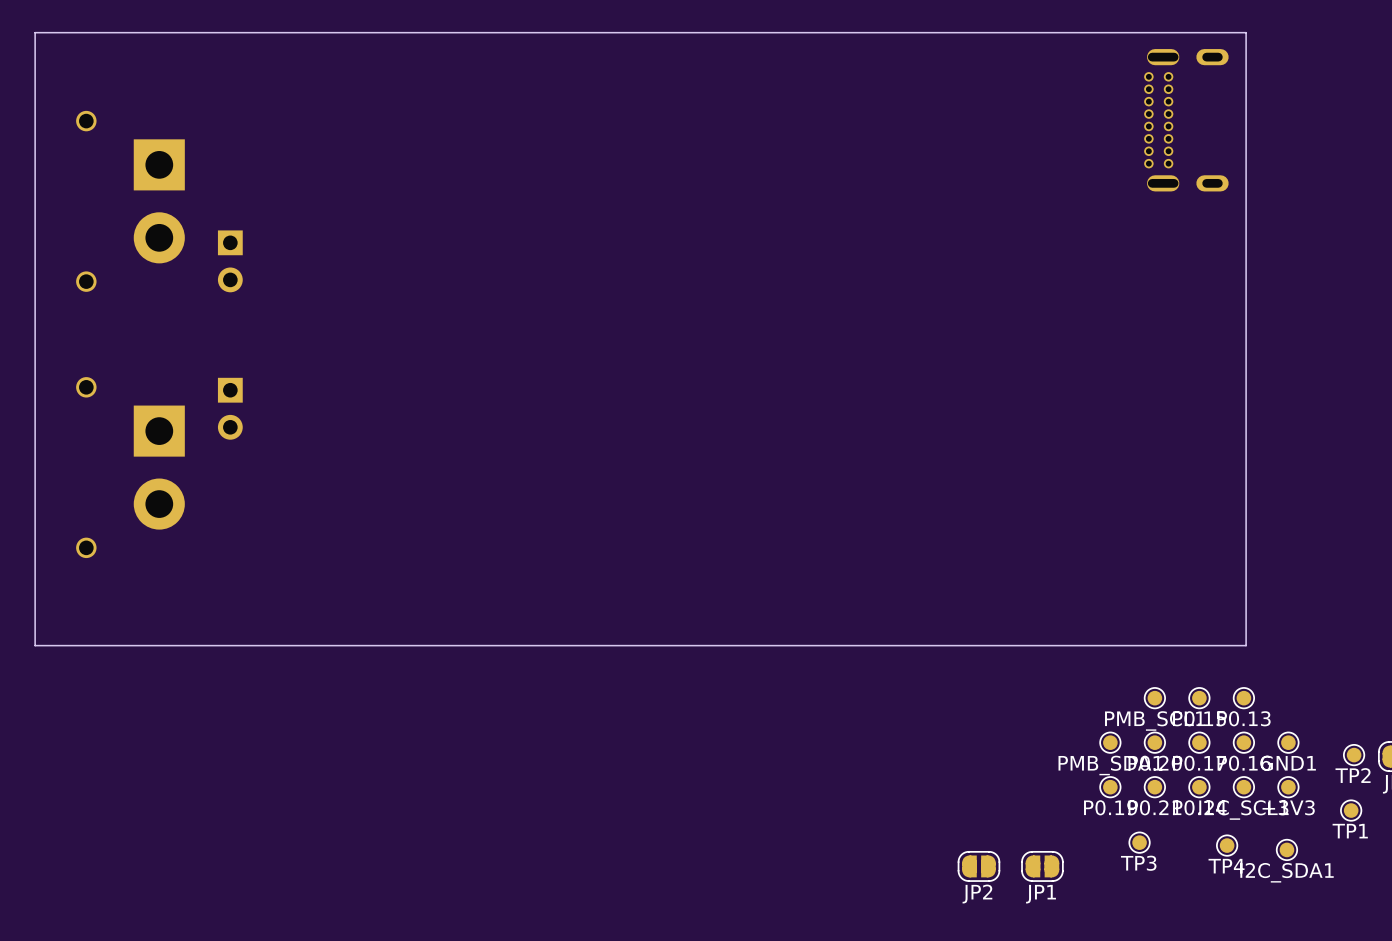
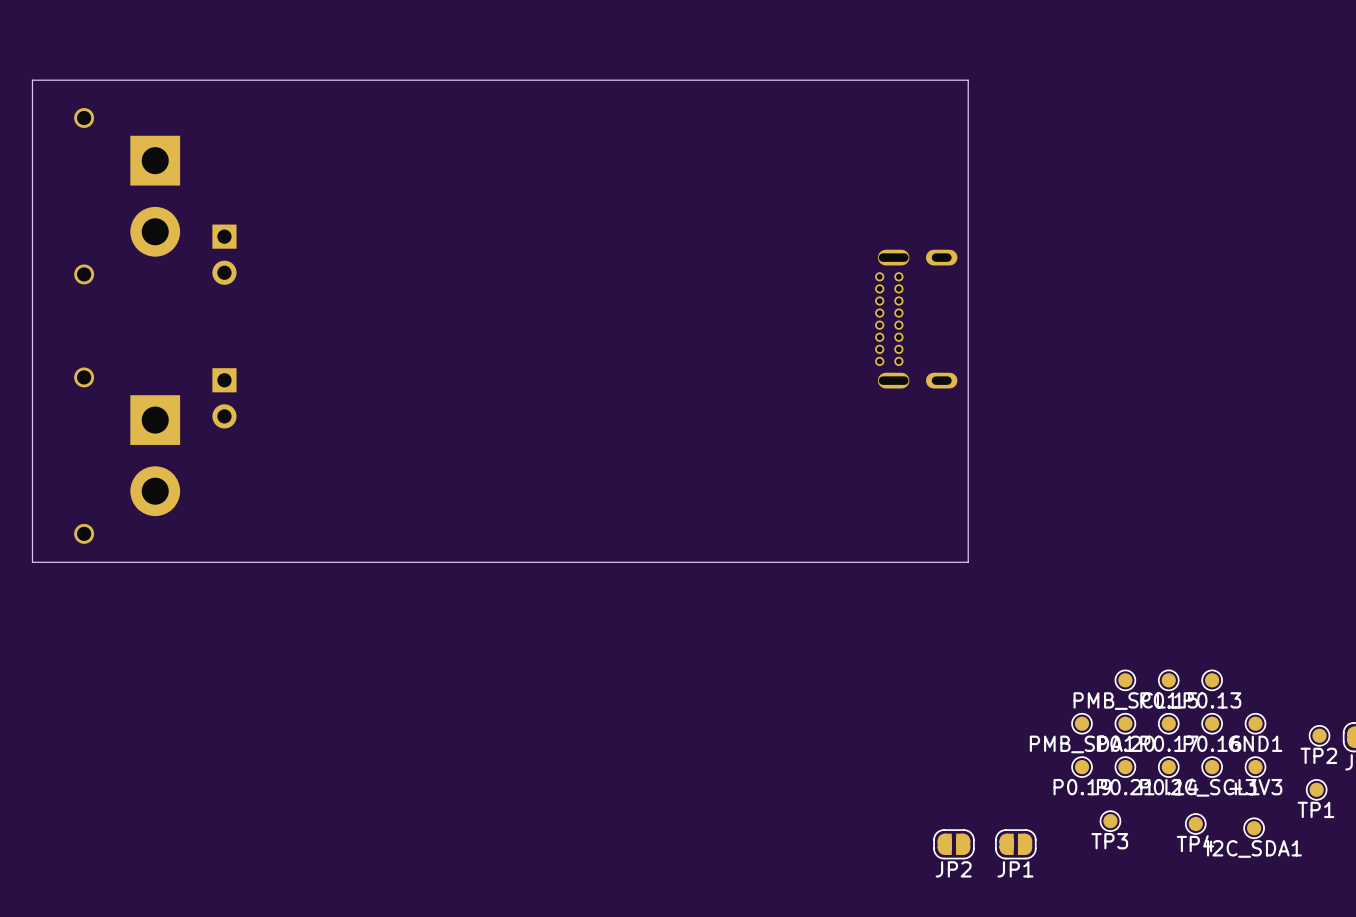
board edge: (1246, 32) (35, 32) (35, 645) (1246, 645) (1246, 32) -> (968, 80) (968, 562) (32, 562) (32, 80) (968, 80)
part position: (1186, 120) -> (916, 319)

